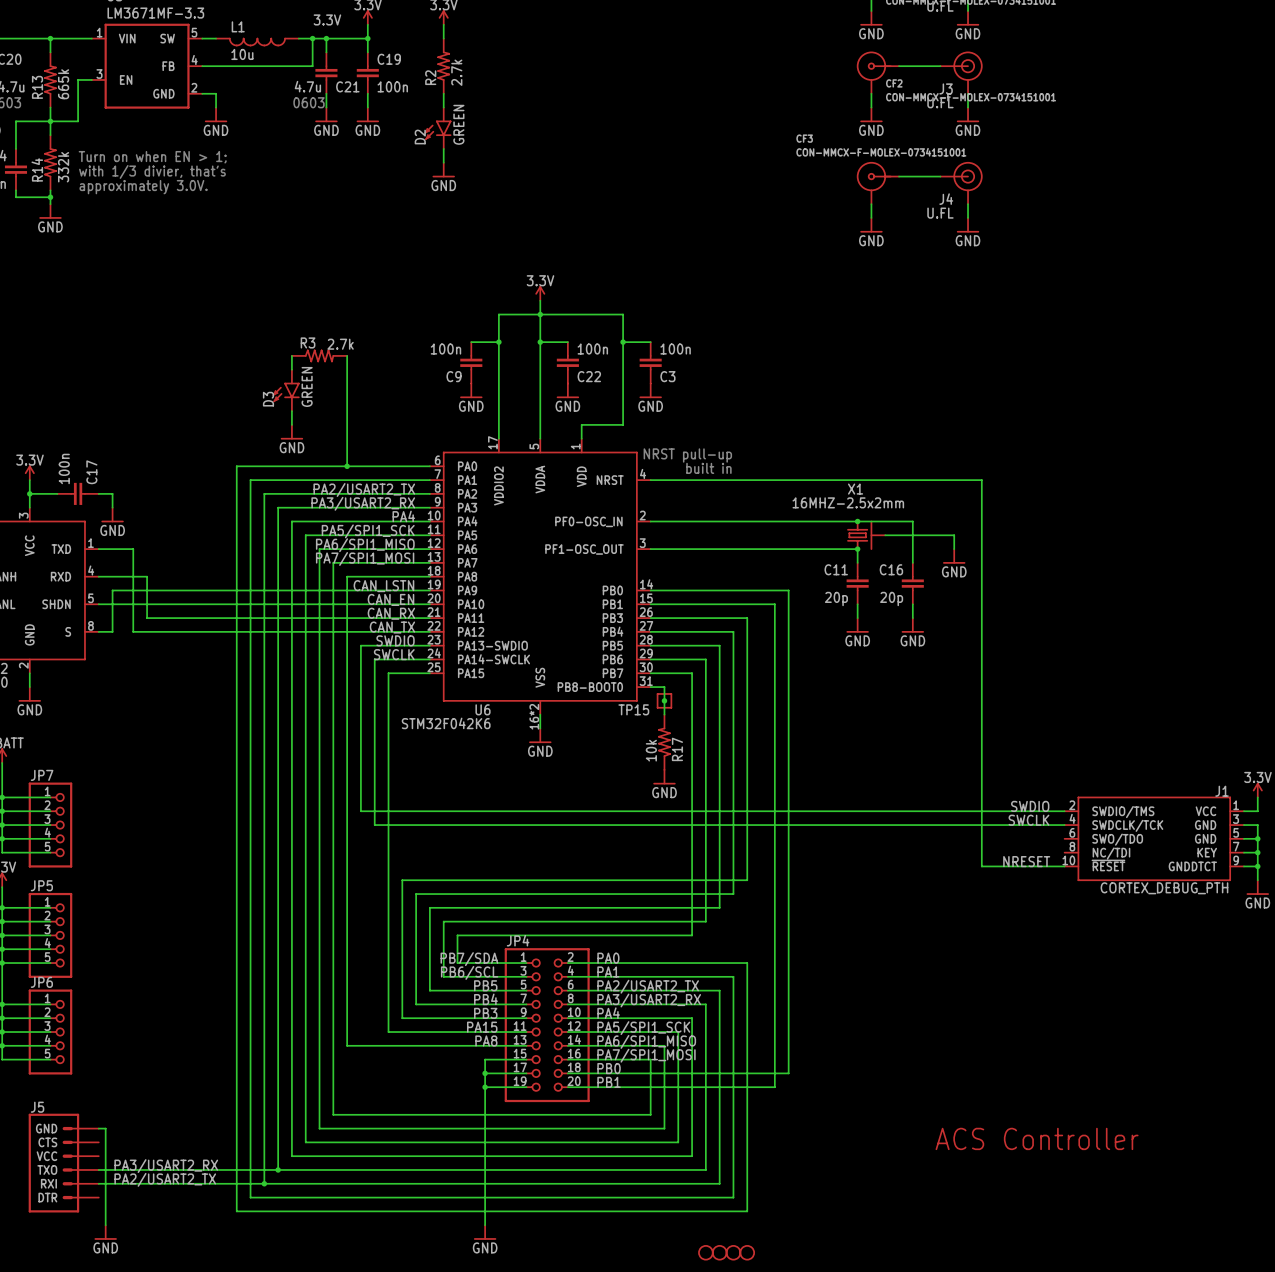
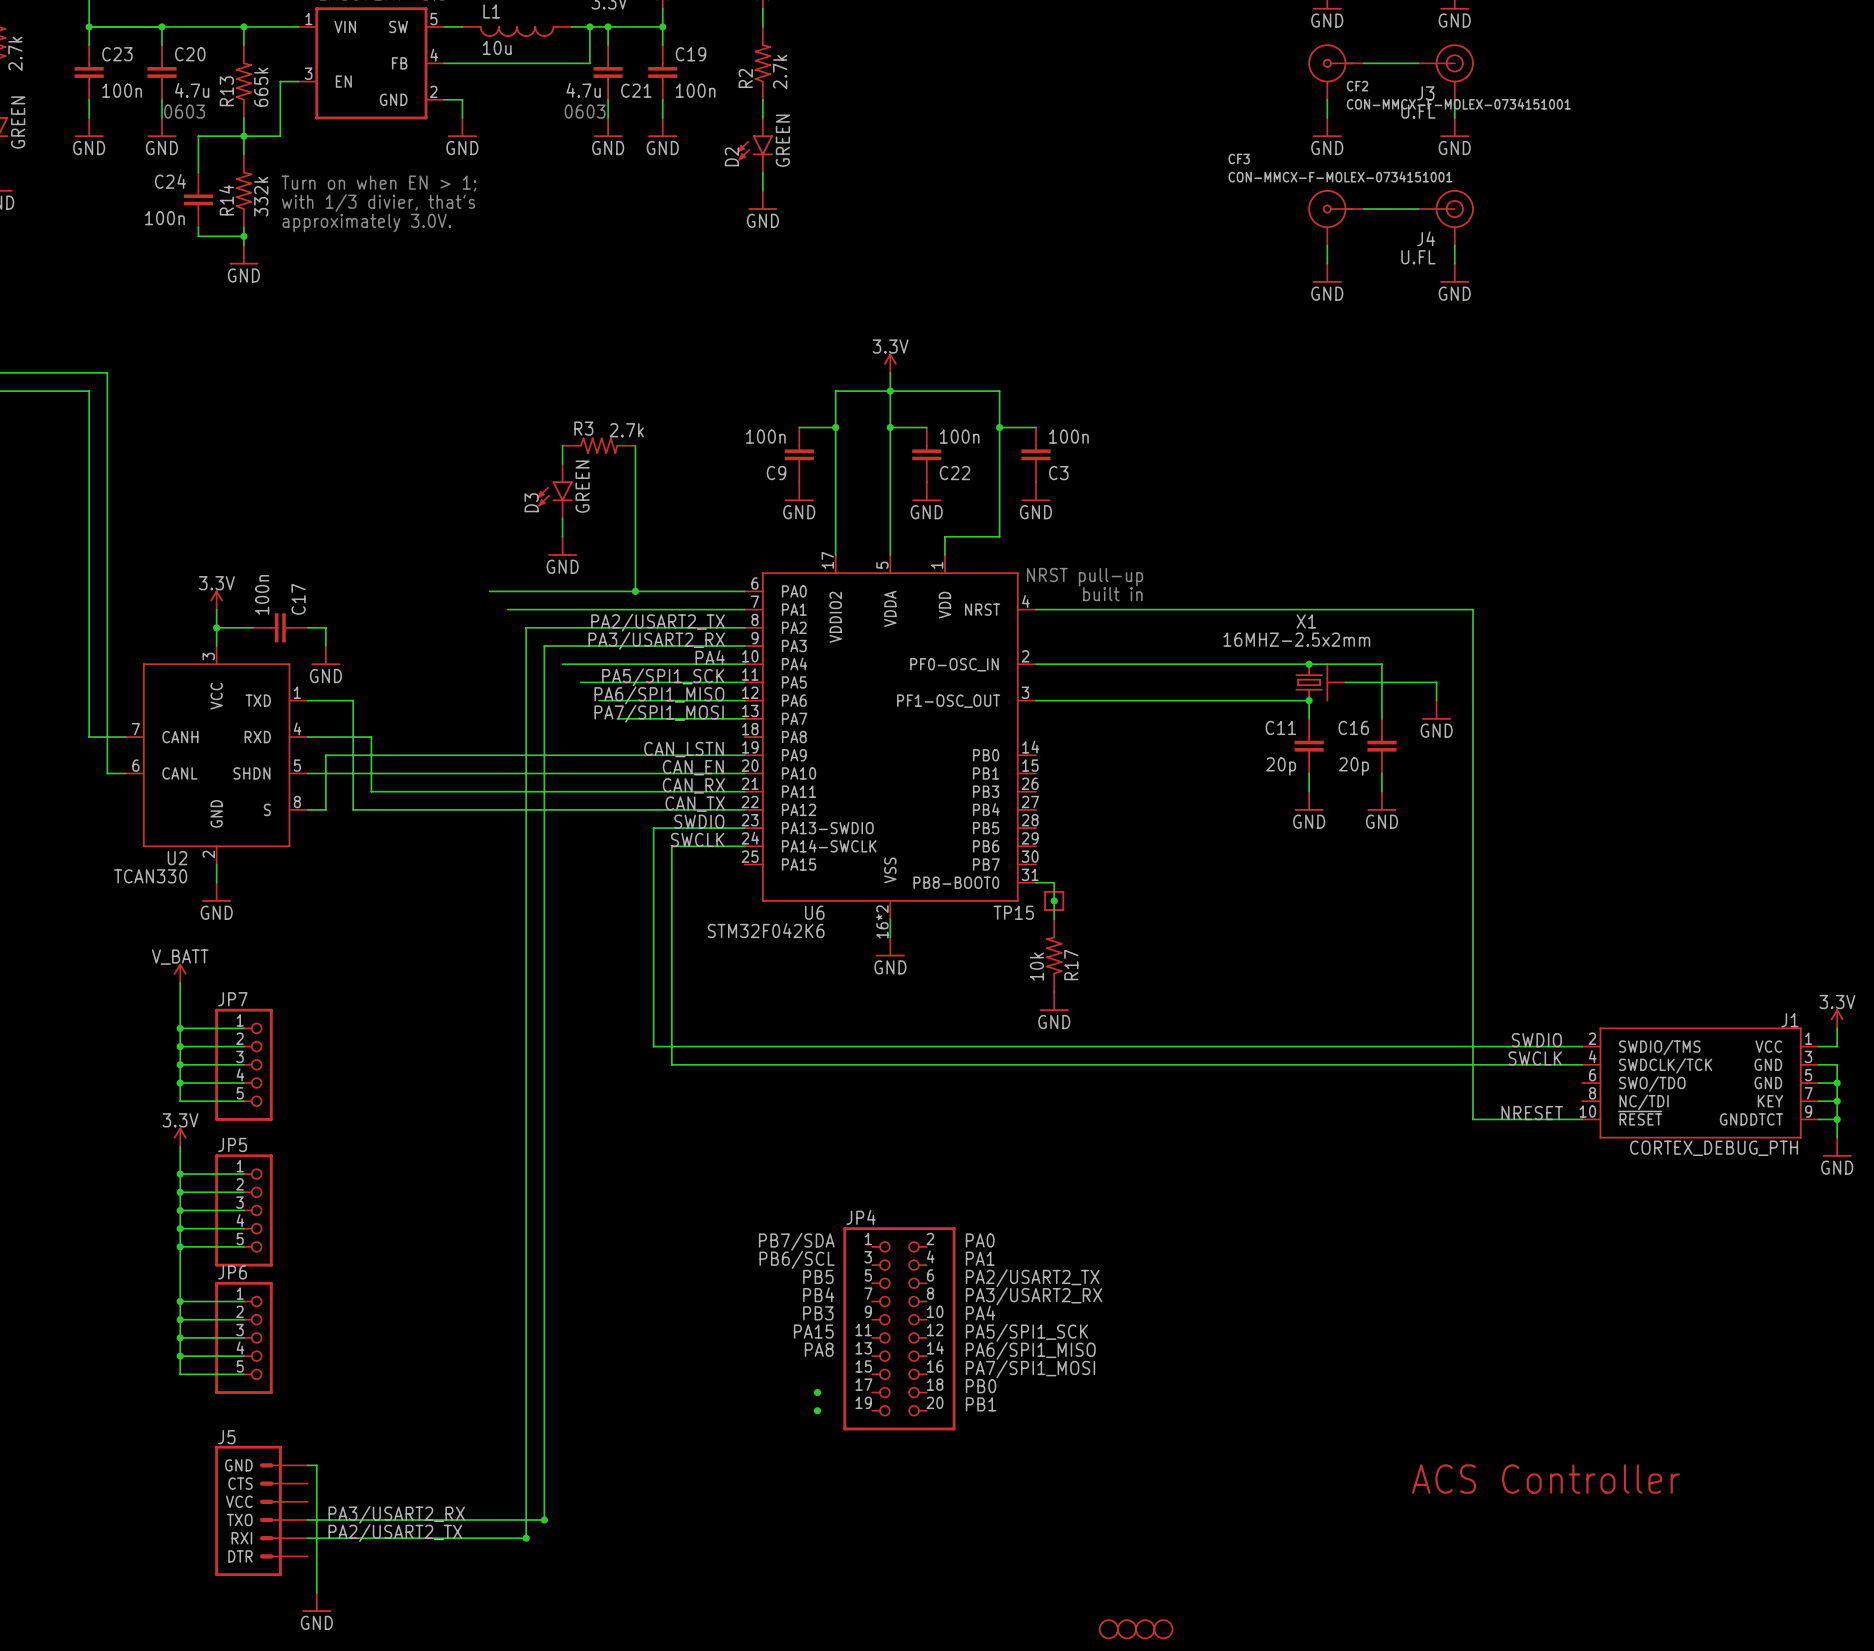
wire: (236, 466) (236, 1211) (747, 1211) (747, 963) (567, 963) -> none
wire: (250, 480) (250, 1197) (733, 1197) (733, 976) (567, 976) -> none
wire: (291, 521) (291, 1156) (692, 1156) (692, 1018) (567, 1018) -> none
wire: (305, 535) (305, 1142) (678, 1142) (678, 1032) (567, 1032) -> none
wire: (319, 549) (319, 1128) (664, 1128) (664, 1045) (567, 1045) -> none
wire: (333, 562) (333, 1114) (650, 1114) (650, 1059) (567, 1059) -> none
wire: (429, 576) (347, 576) (347, 1045) (526, 1045) -> none
wire: (650, 590) (788, 590) (788, 1073) (567, 1073) -> none
wire: (650, 604) (774, 604) (774, 1087) (567, 1087) -> none
wire: (650, 618) (747, 618) (747, 880) (402, 880) (402, 1018) (526, 1018) -> none
wire: (650, 631) (733, 631) (733, 894) (416, 894) (416, 1004) (526, 1004) -> none
wire: (650, 645) (719, 645) (719, 907) (429, 907) (429, 990) (526, 990) -> none
wire: (650, 659) (705, 659) (705, 921) (443, 921) (443, 976) (526, 976) -> none
wire: (429, 673) (388, 673) (388, 1032) (526, 1032) -> none
wire: (650, 673) (692, 673) (692, 935) (457, 935) (457, 963) (526, 963) -> none
wire: (567, 990) (719, 990) (719, 1183) (264, 1183) -> none
wire: (567, 1004) (705, 1004) (705, 1169) (278, 1169) -> none
wire: (526, 1059) (485, 1059) (485, 1225) -> none
wire: (485, 1073) (526, 1073) -> none
wire: (485, 1087) (526, 1087) -> none
power symbol: GND (485, 1232) -> none

